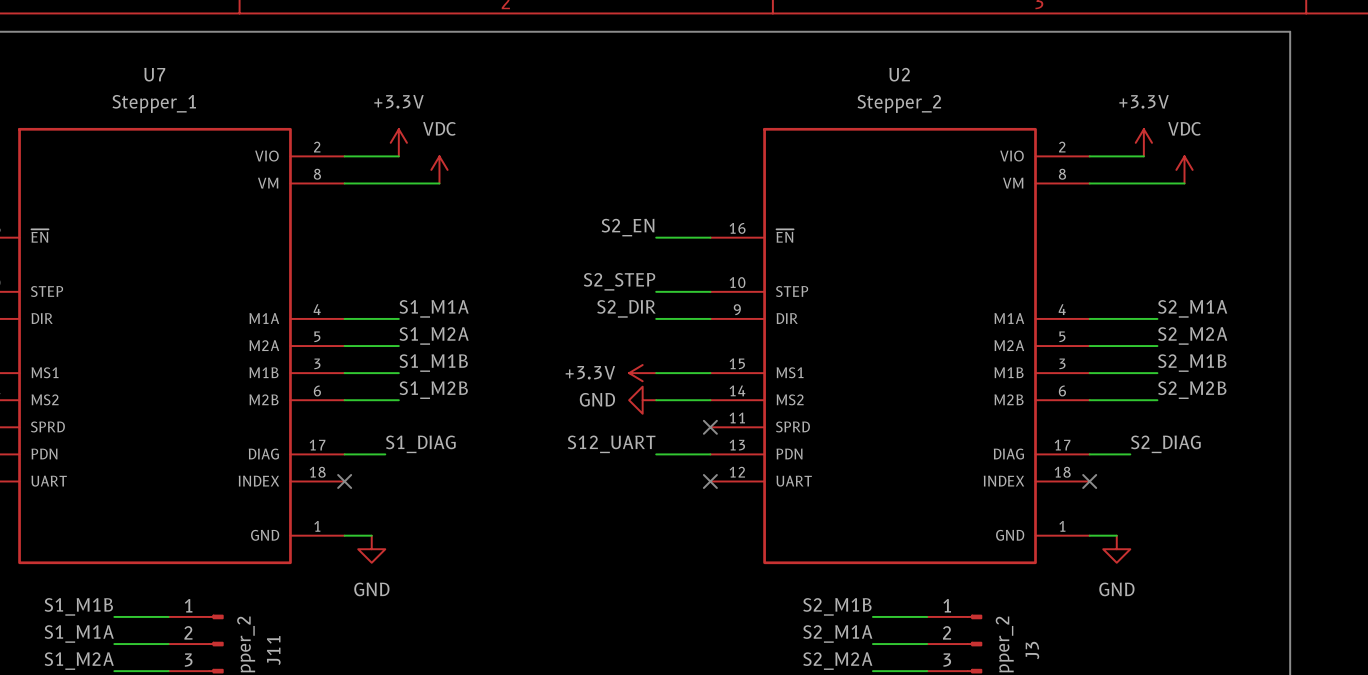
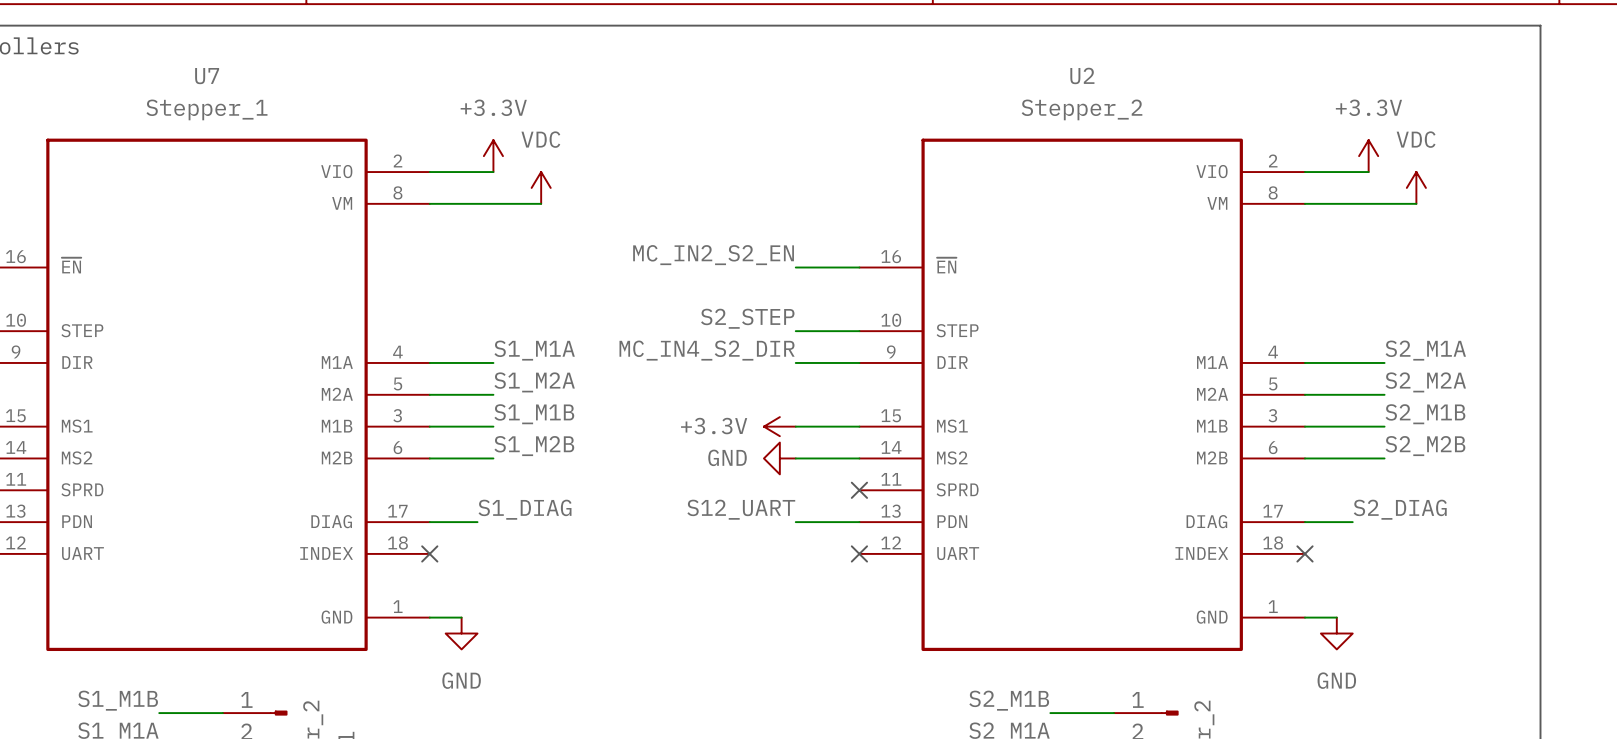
label: S2_EN (628, 227) -> MC_IN2_S2_EN (713, 255)
label: S2_DIR (626, 308) -> MC_IN4_S2_DIR (707, 350)

